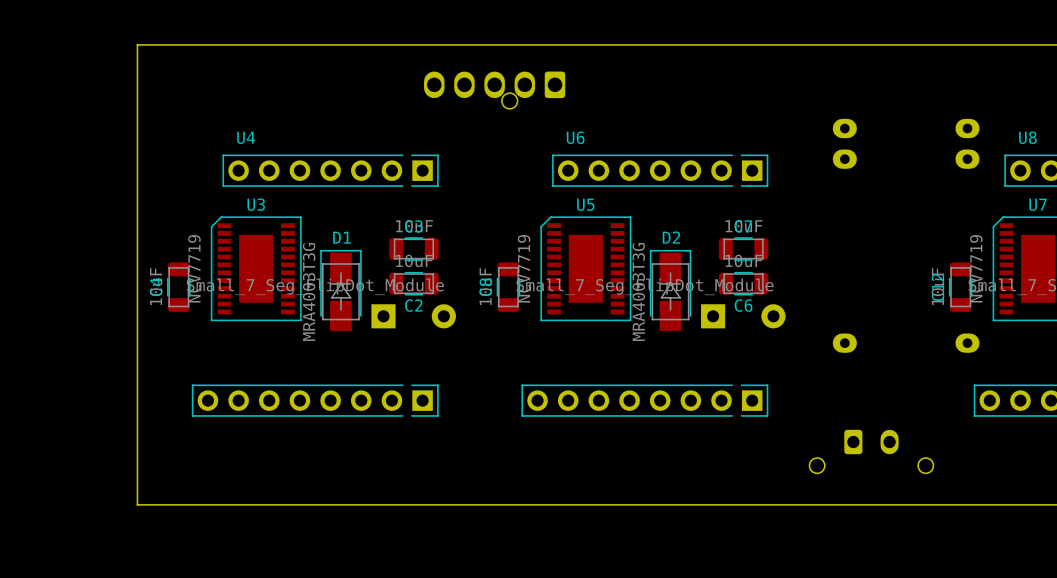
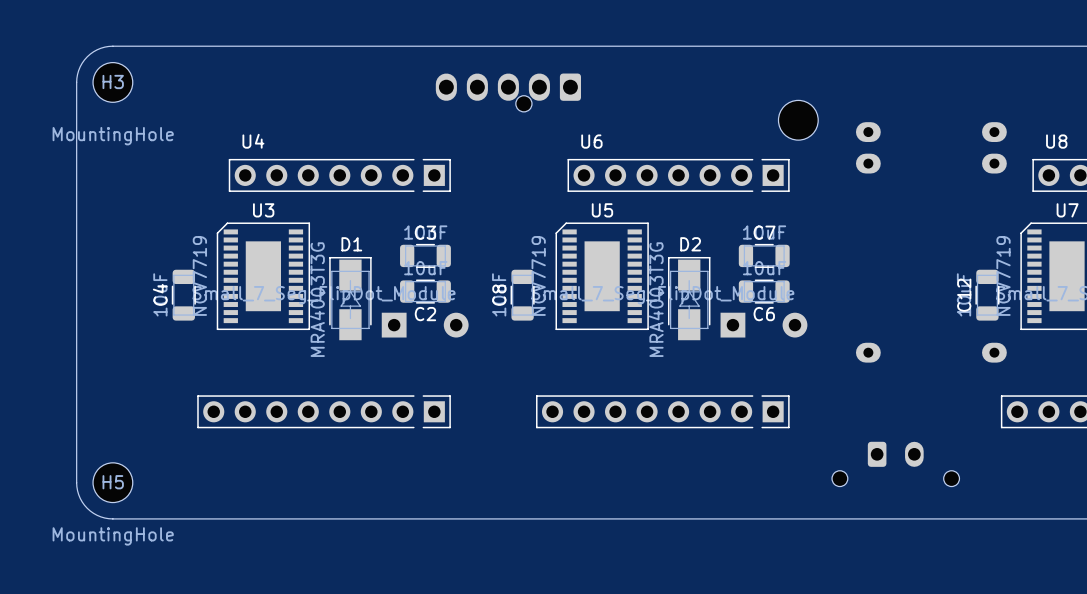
board edge: (137, 44) (137, 504) -> (141, 46) (108, 46) (93, 51) (80, 66) (76, 82) (76, 486) (84, 505) (97, 515) (108, 518) (141, 518)
H3: none -> MountingHole (112, 82)
part: none -> (798, 120)
H5: none -> MountingHole (112, 482)

